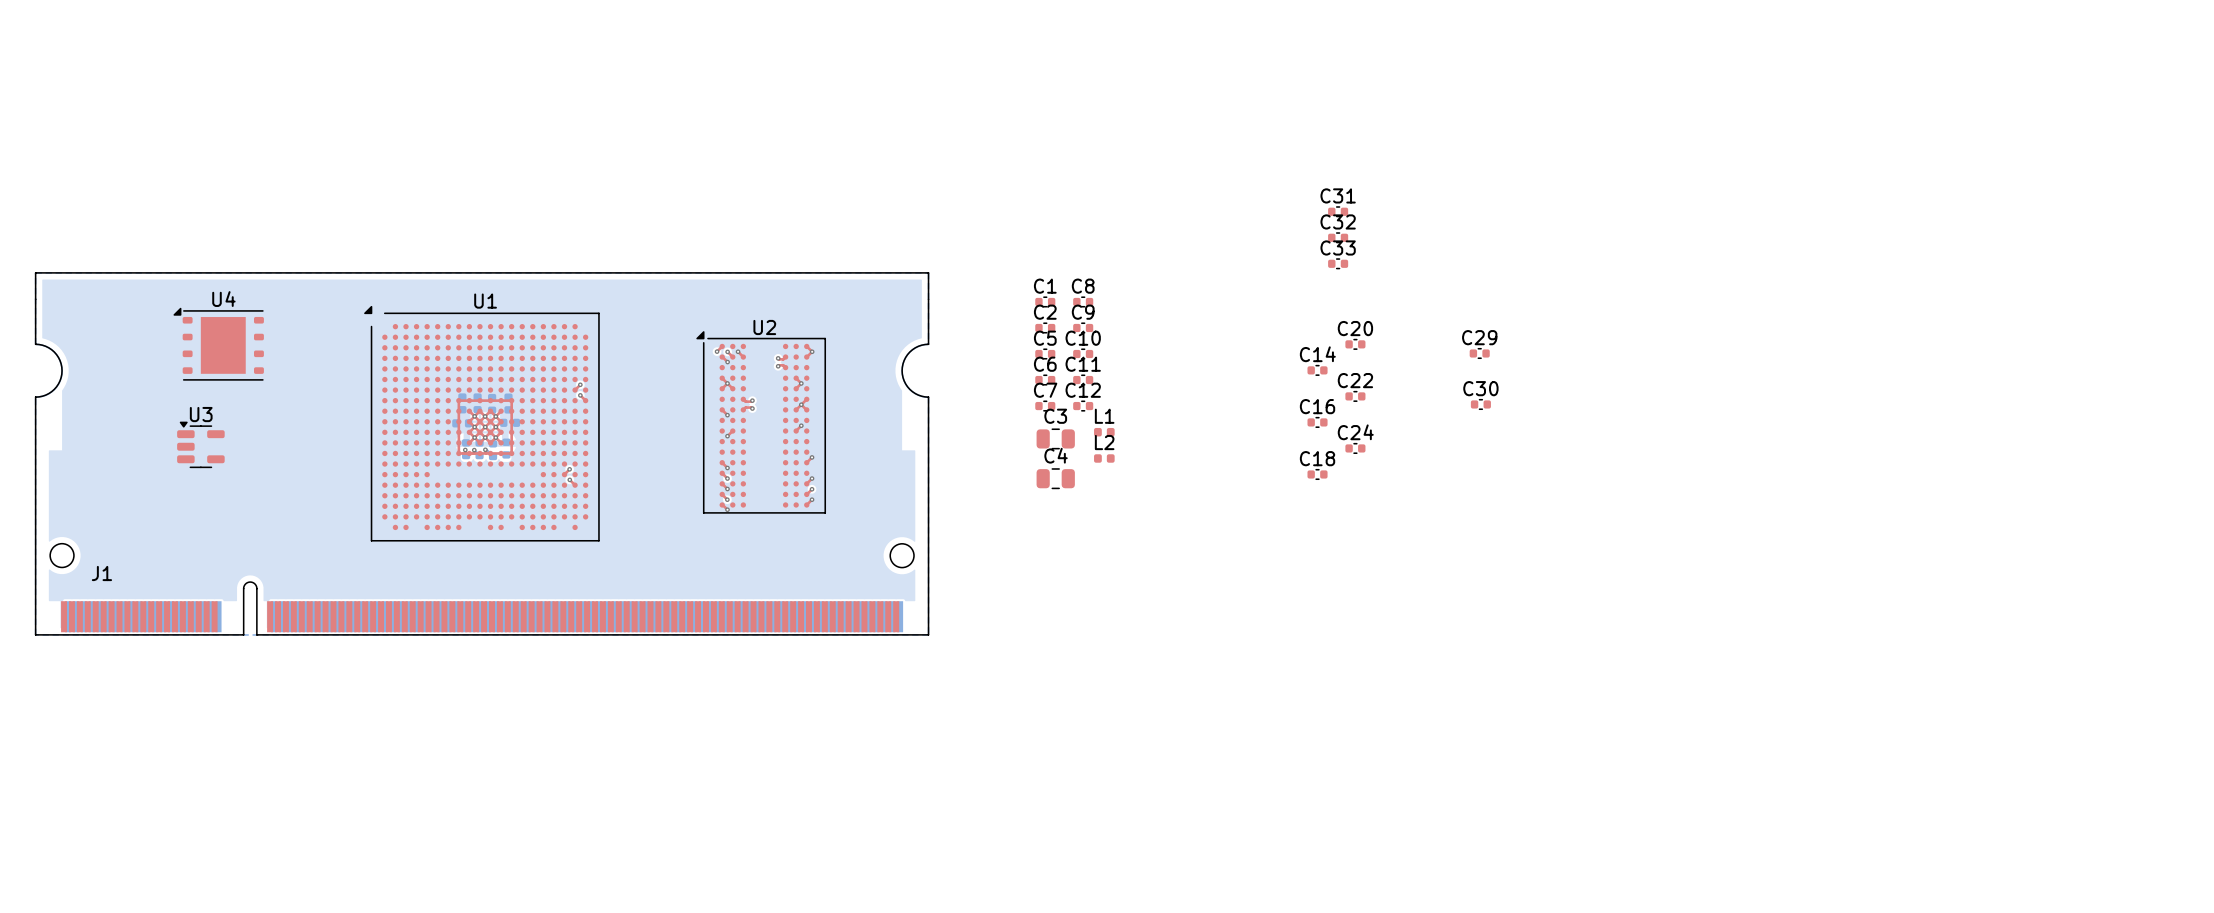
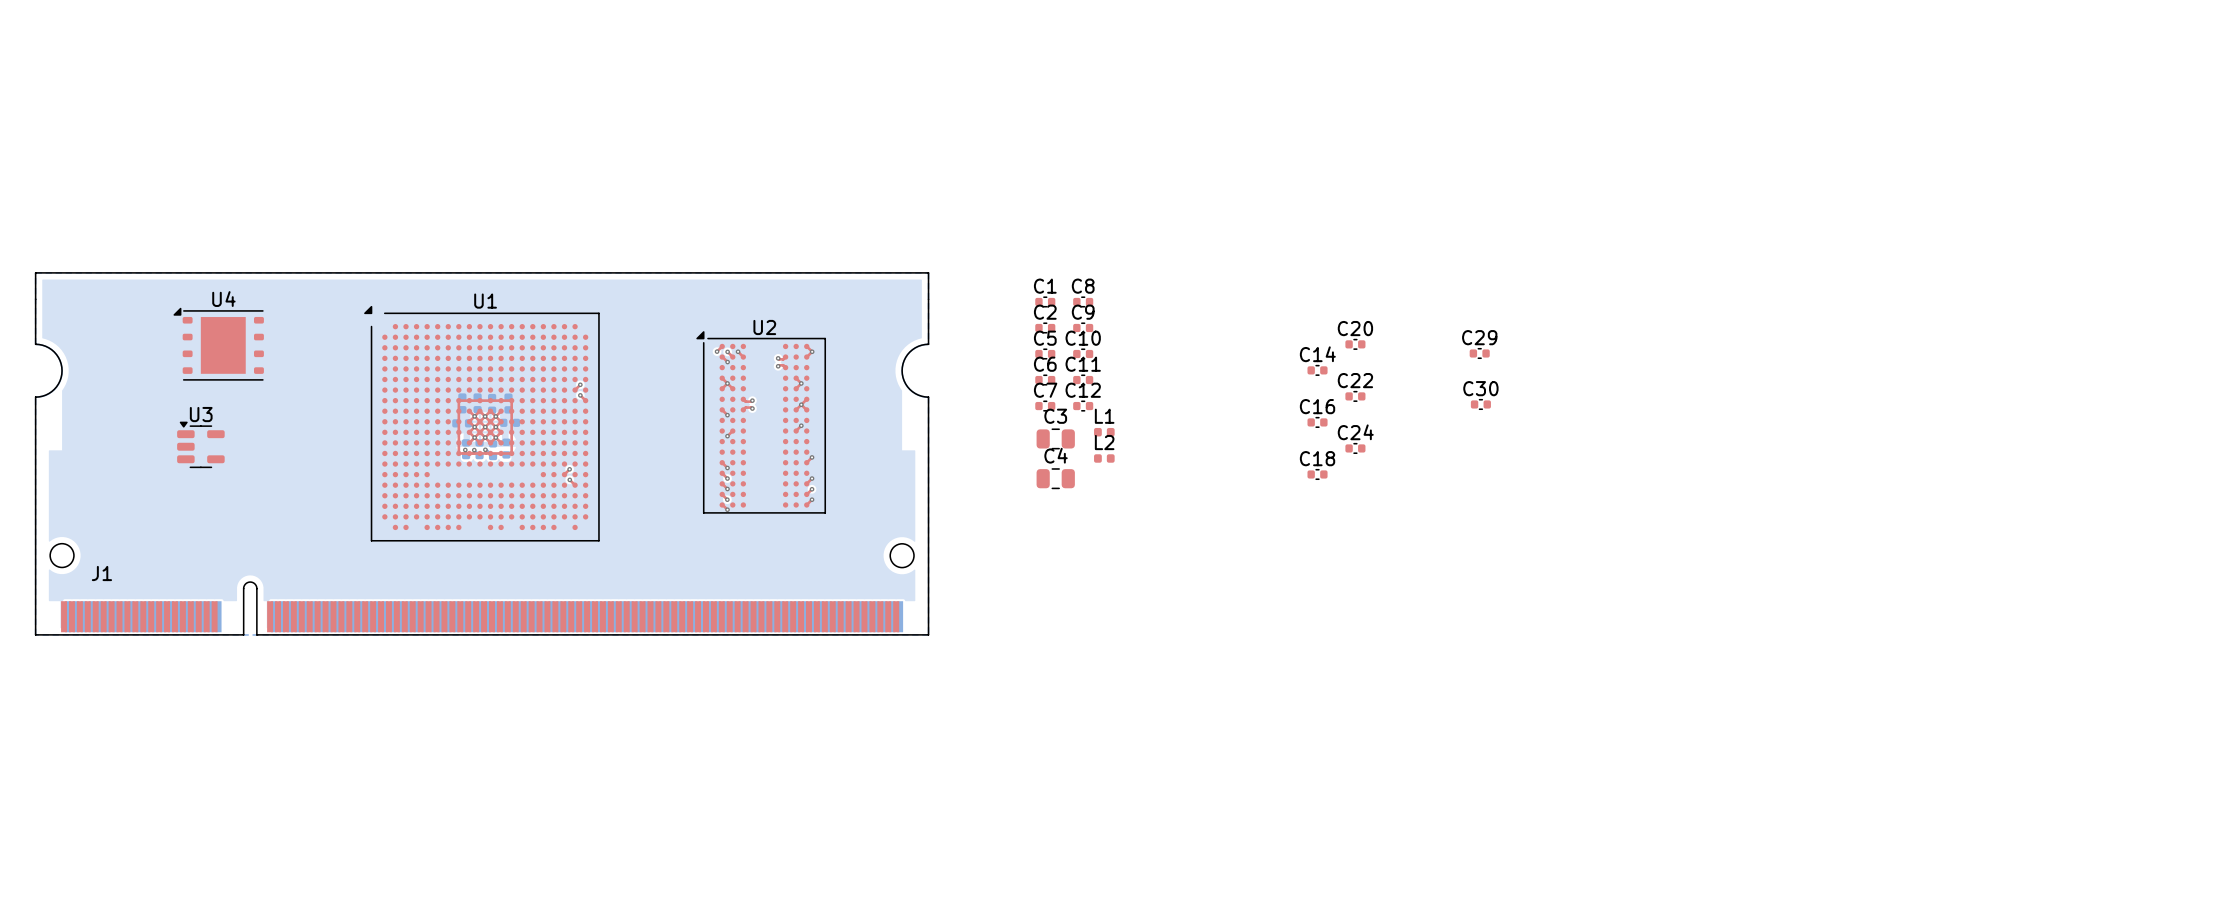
C31: (1338, 211) -> none
C32: (1338, 237) -> none
C33: (1338, 263) -> none

